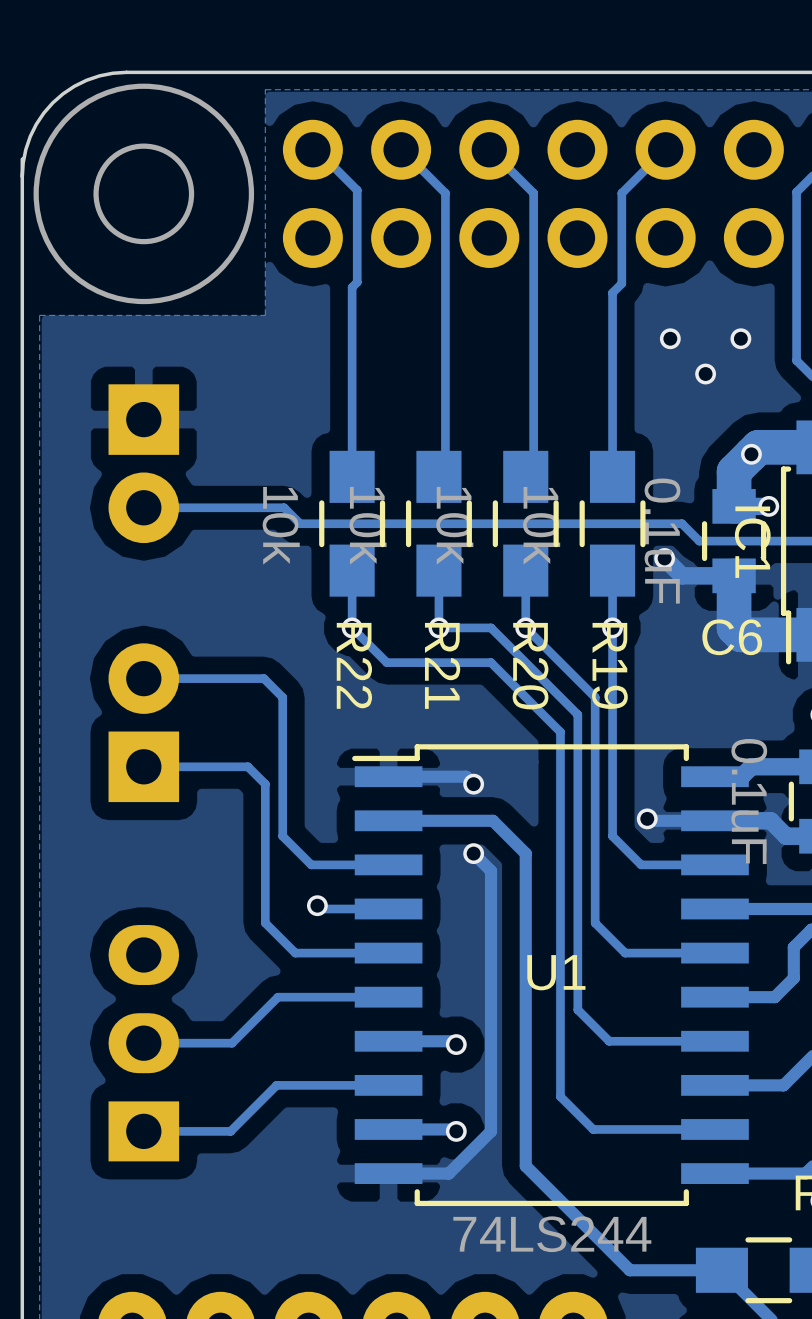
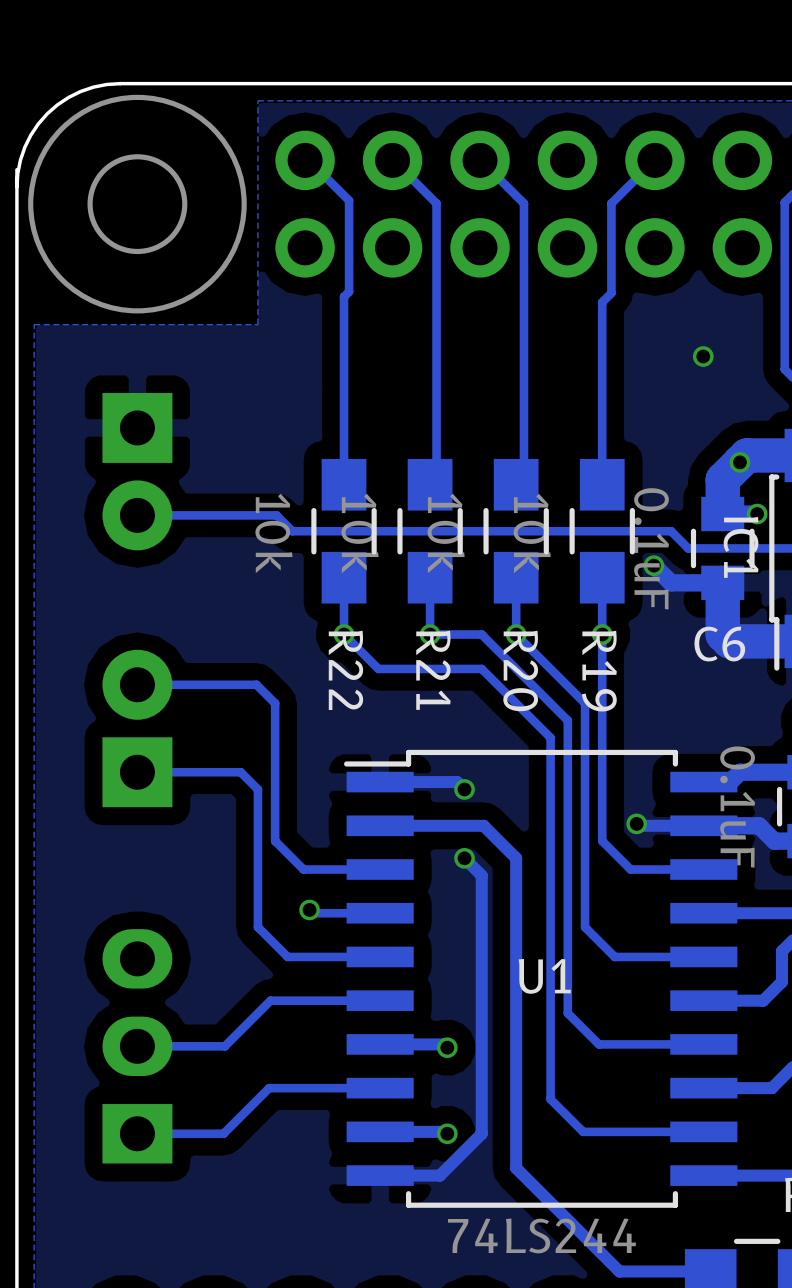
via: (670, 338) -> none
via: (740, 338) -> none
via: none -> (703, 356)
via: (705, 374) -> none

